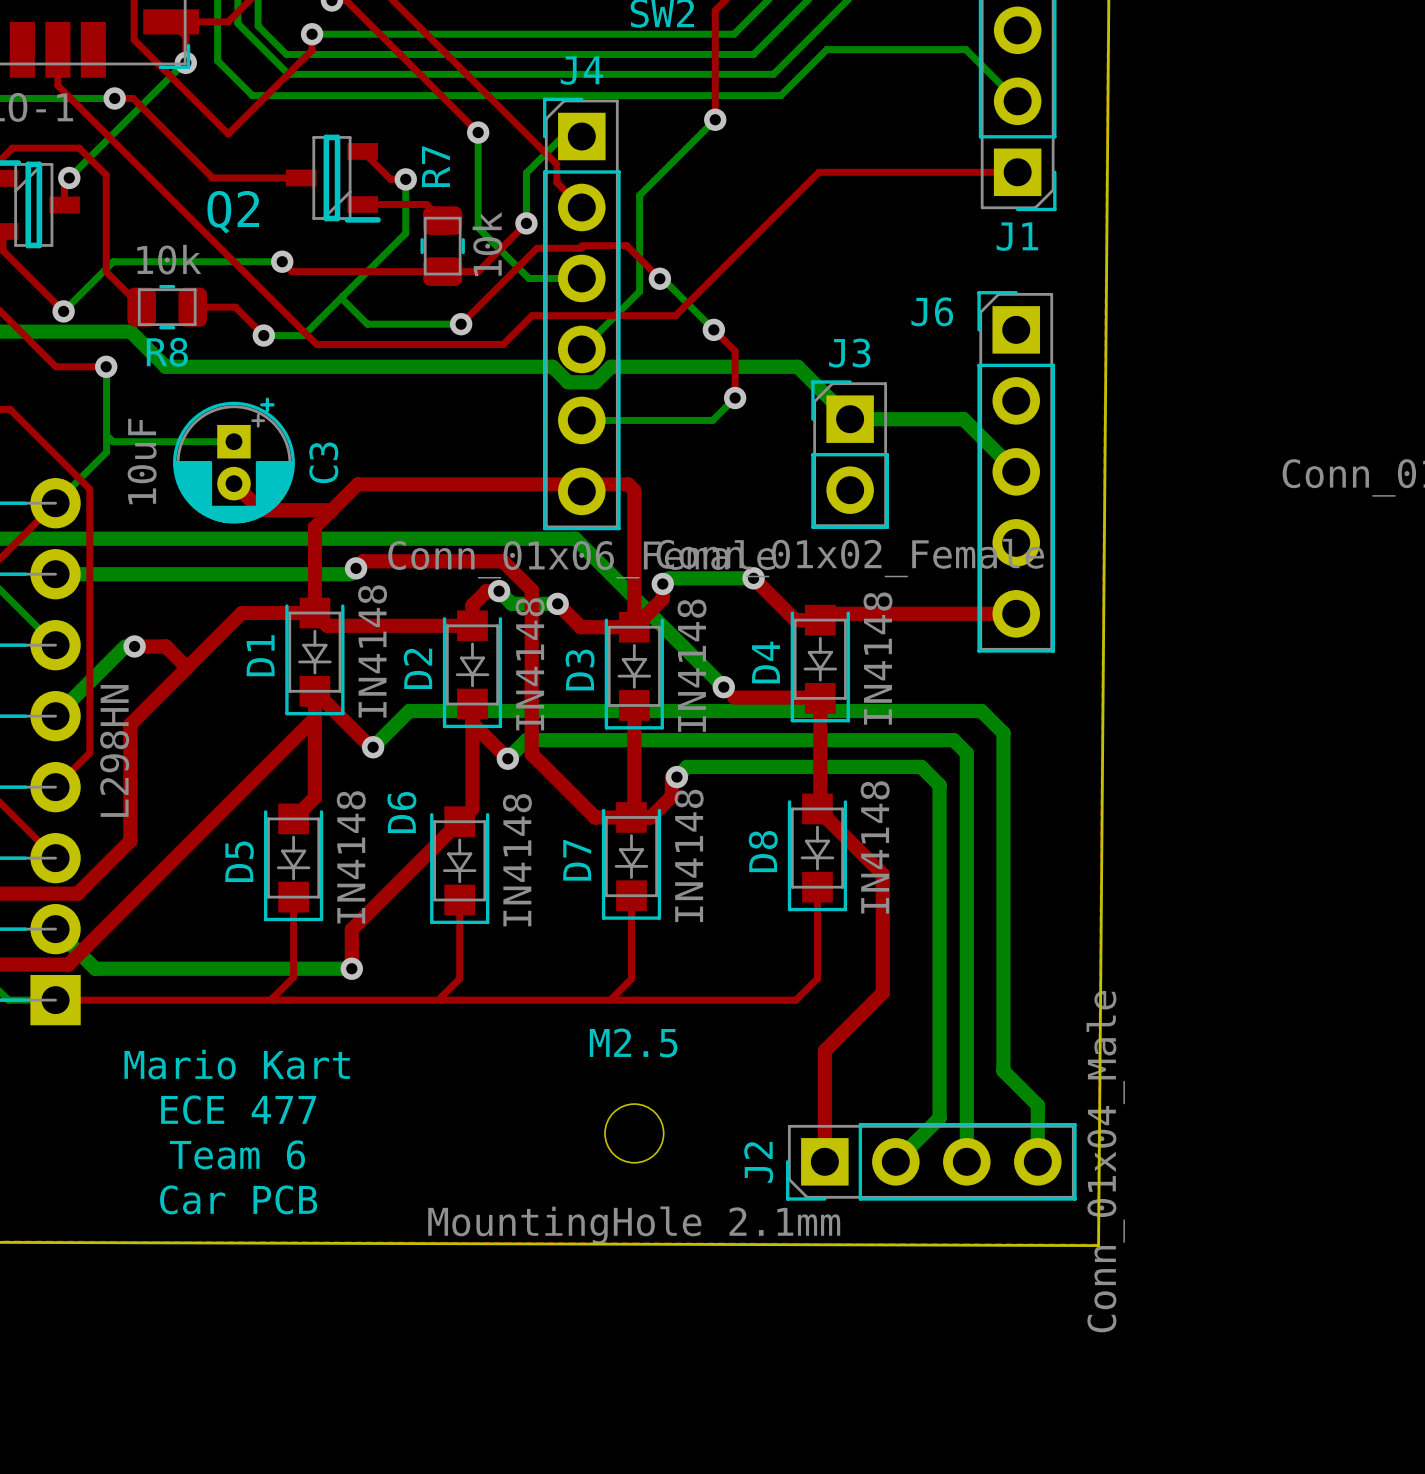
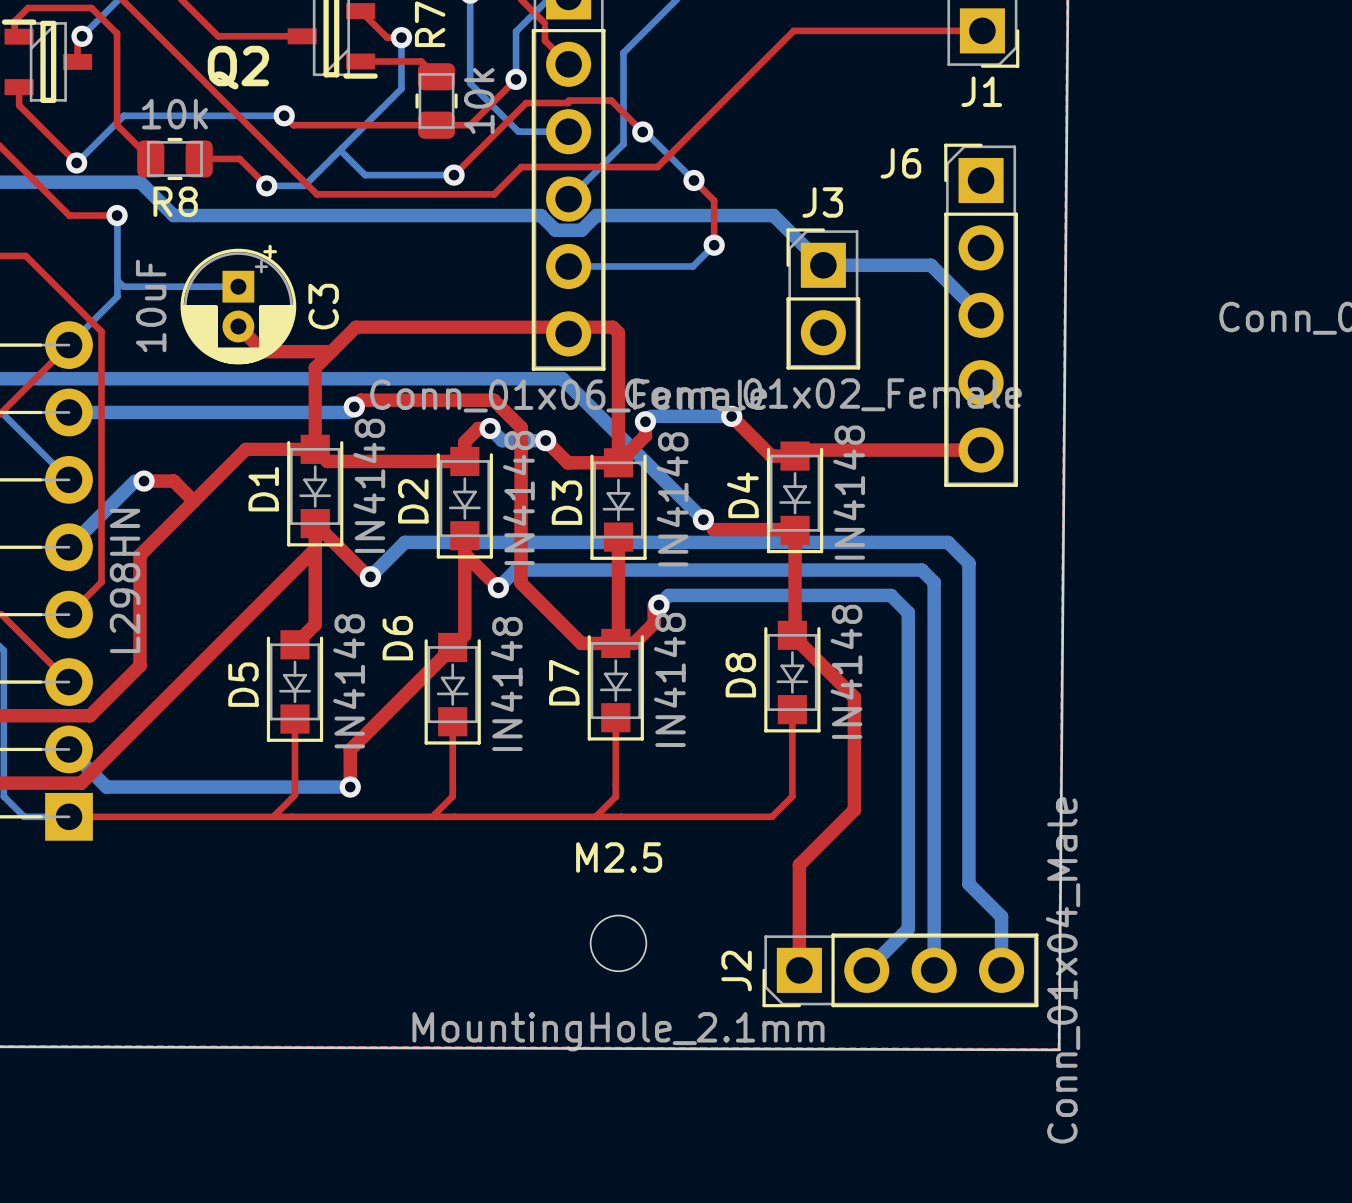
text: Mario Kart (237, 1064) -> none
text: ECE 477 (238, 1109) -> none
text: Team 6 (237, 1154) -> none
text: Car PCB (238, 1199) -> none

